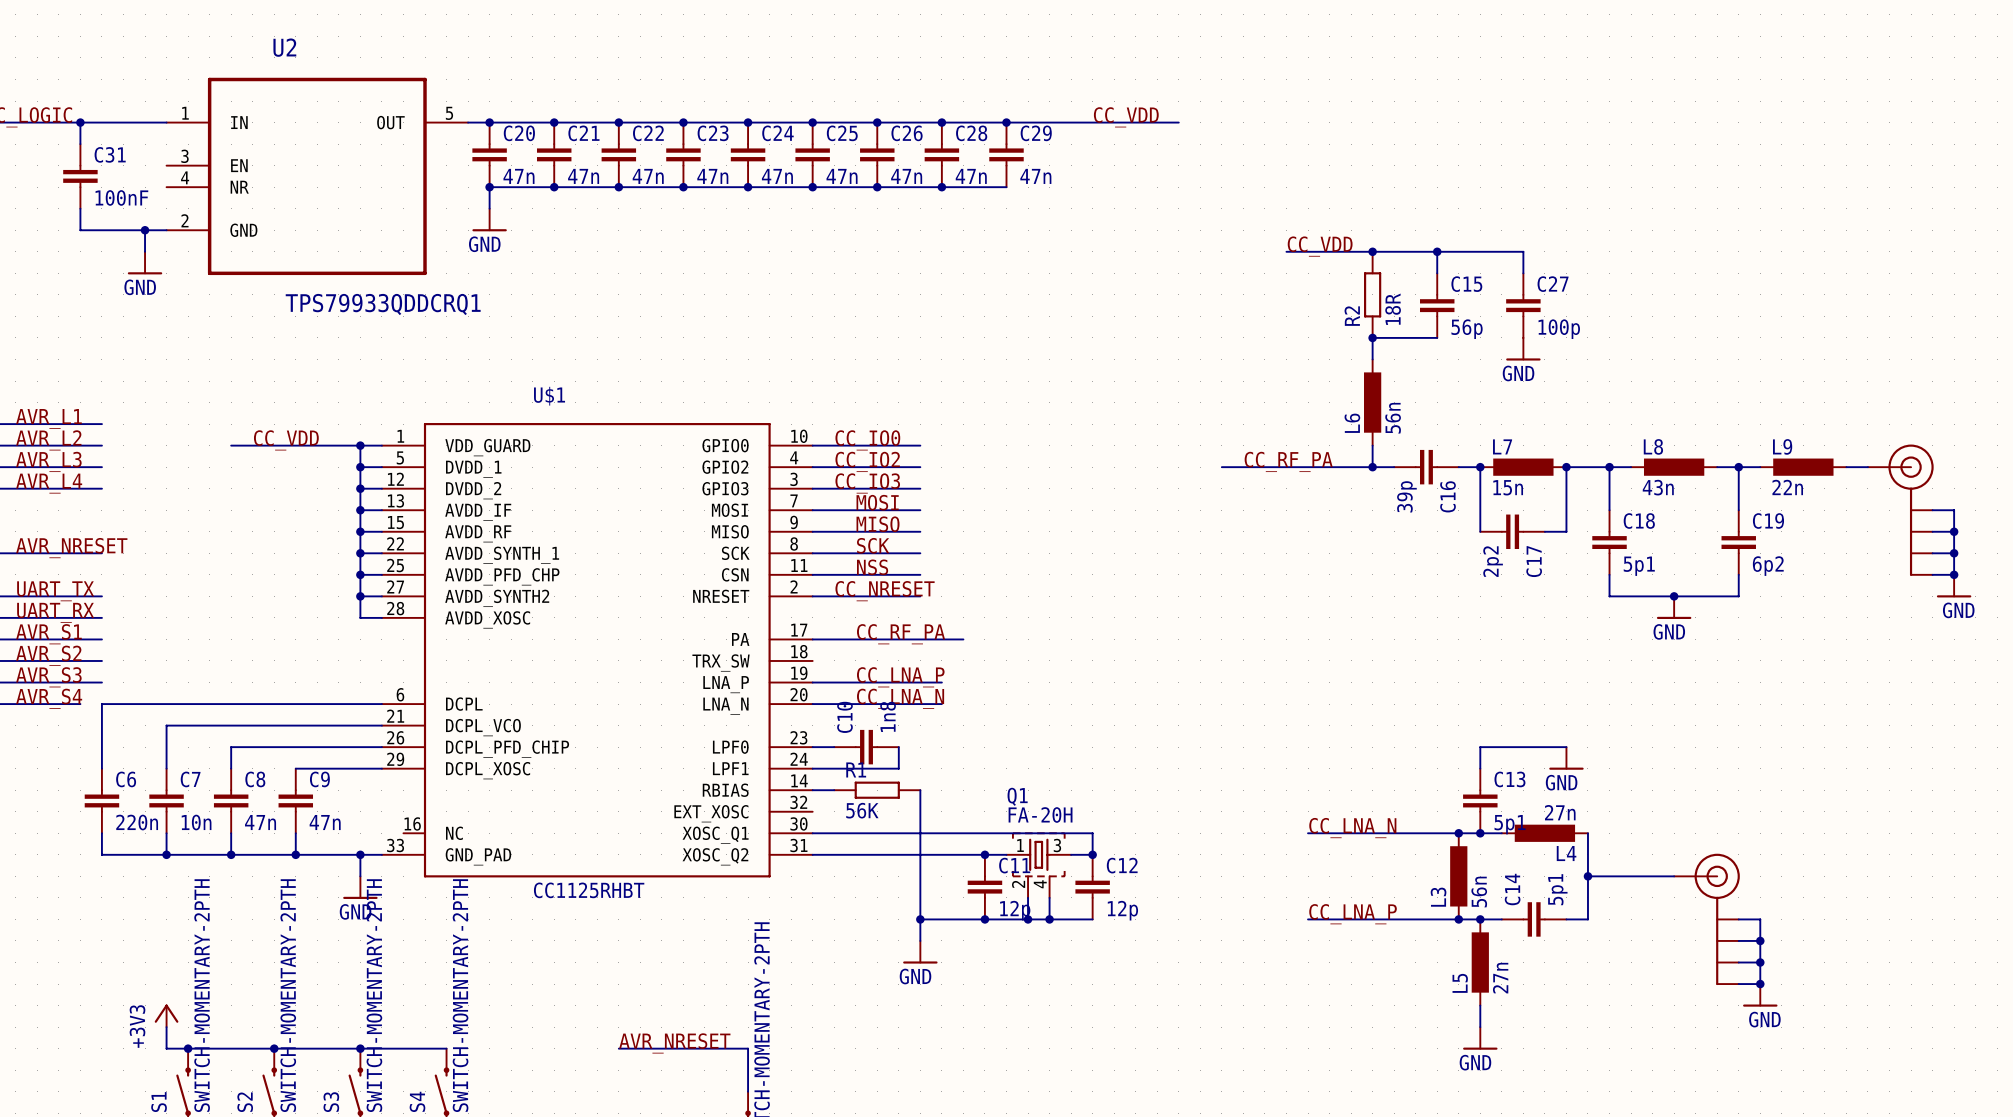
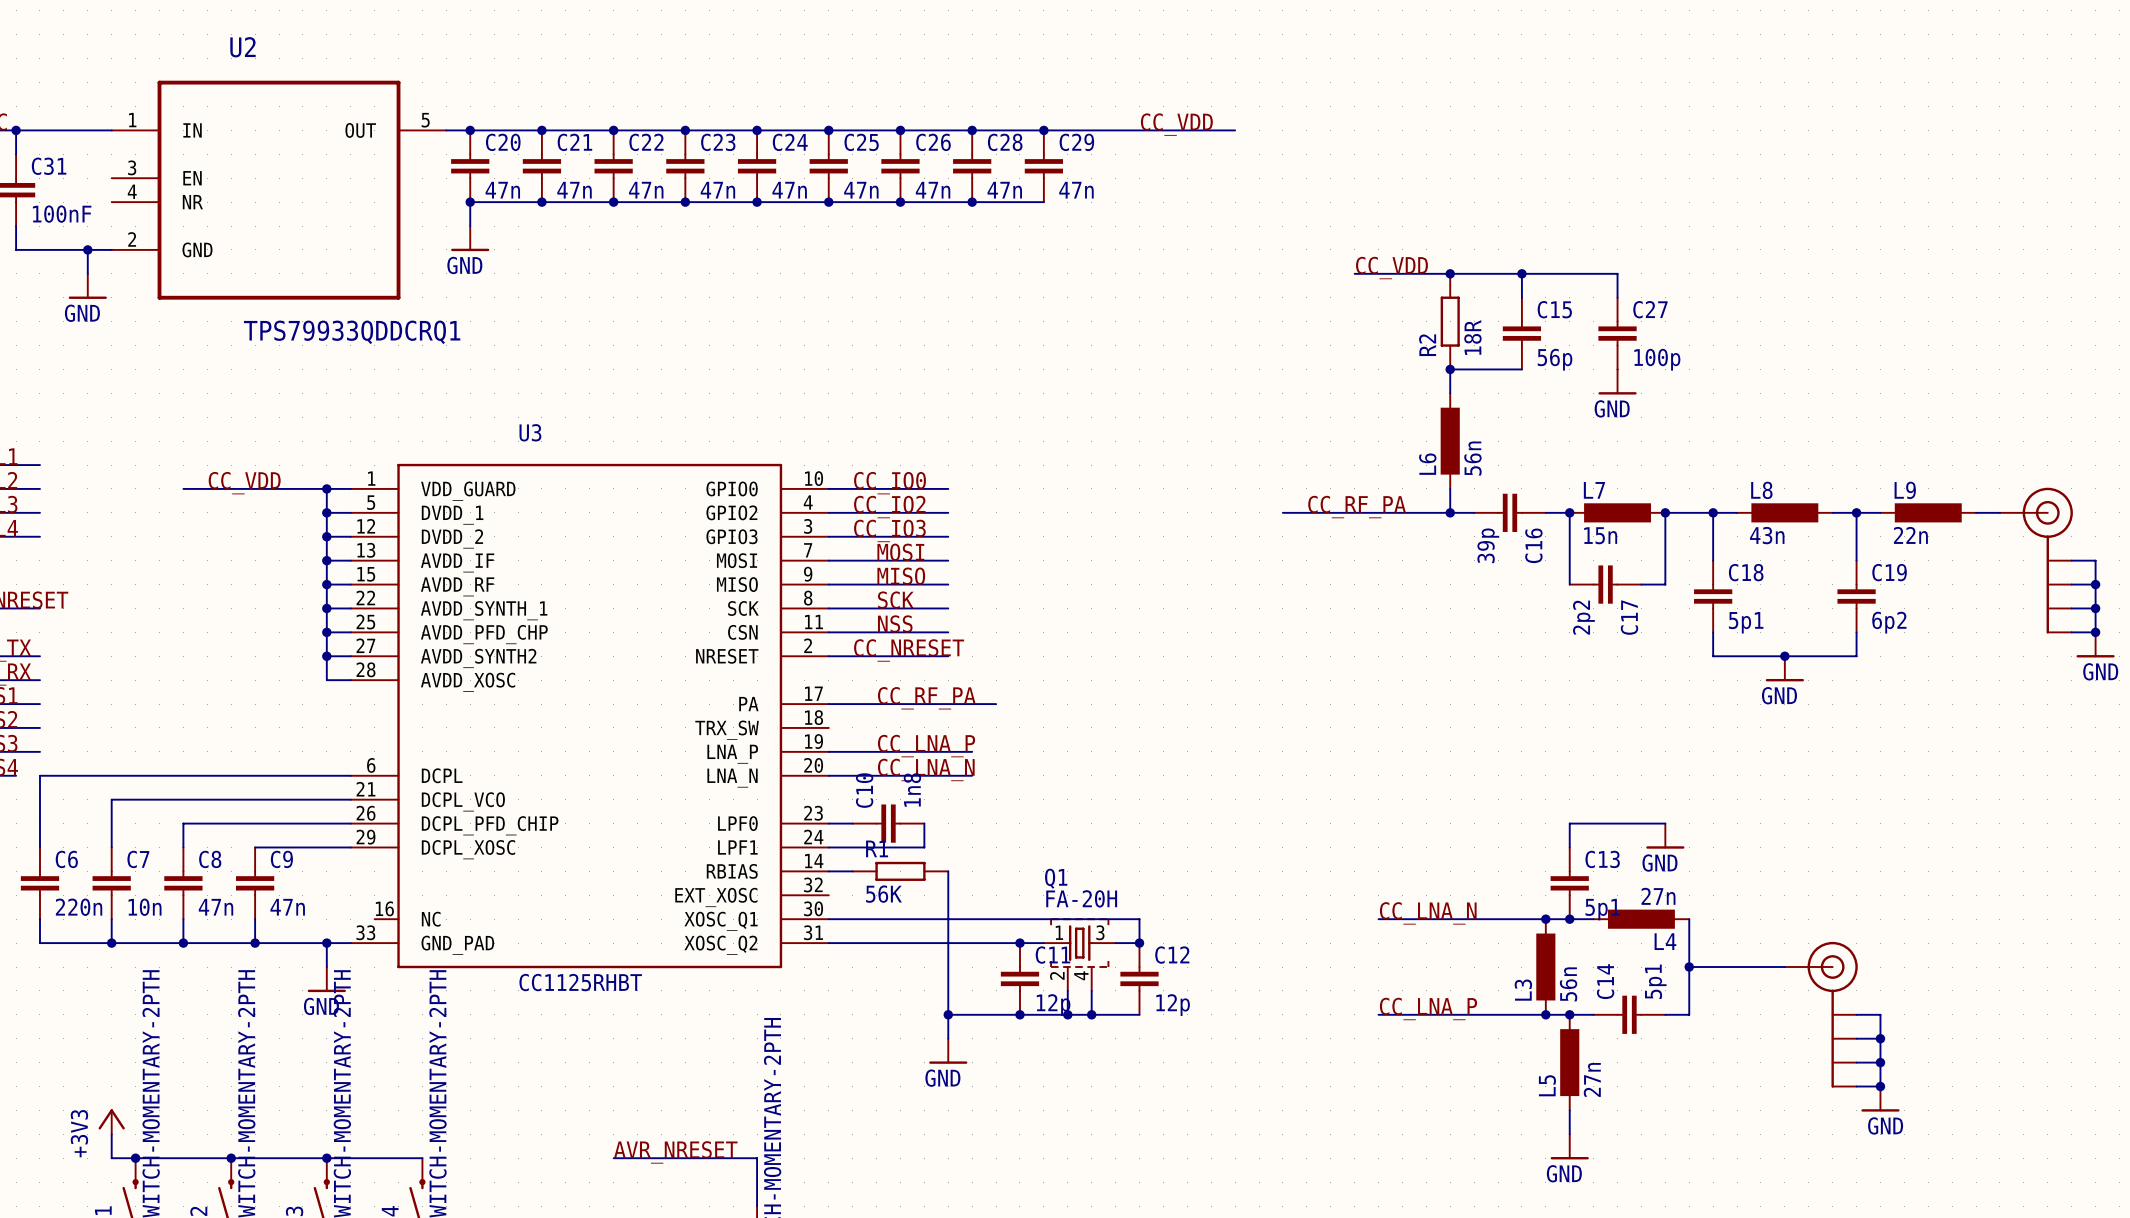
U$1 name: U$1 (549, 396) -> U3 (530, 432)

